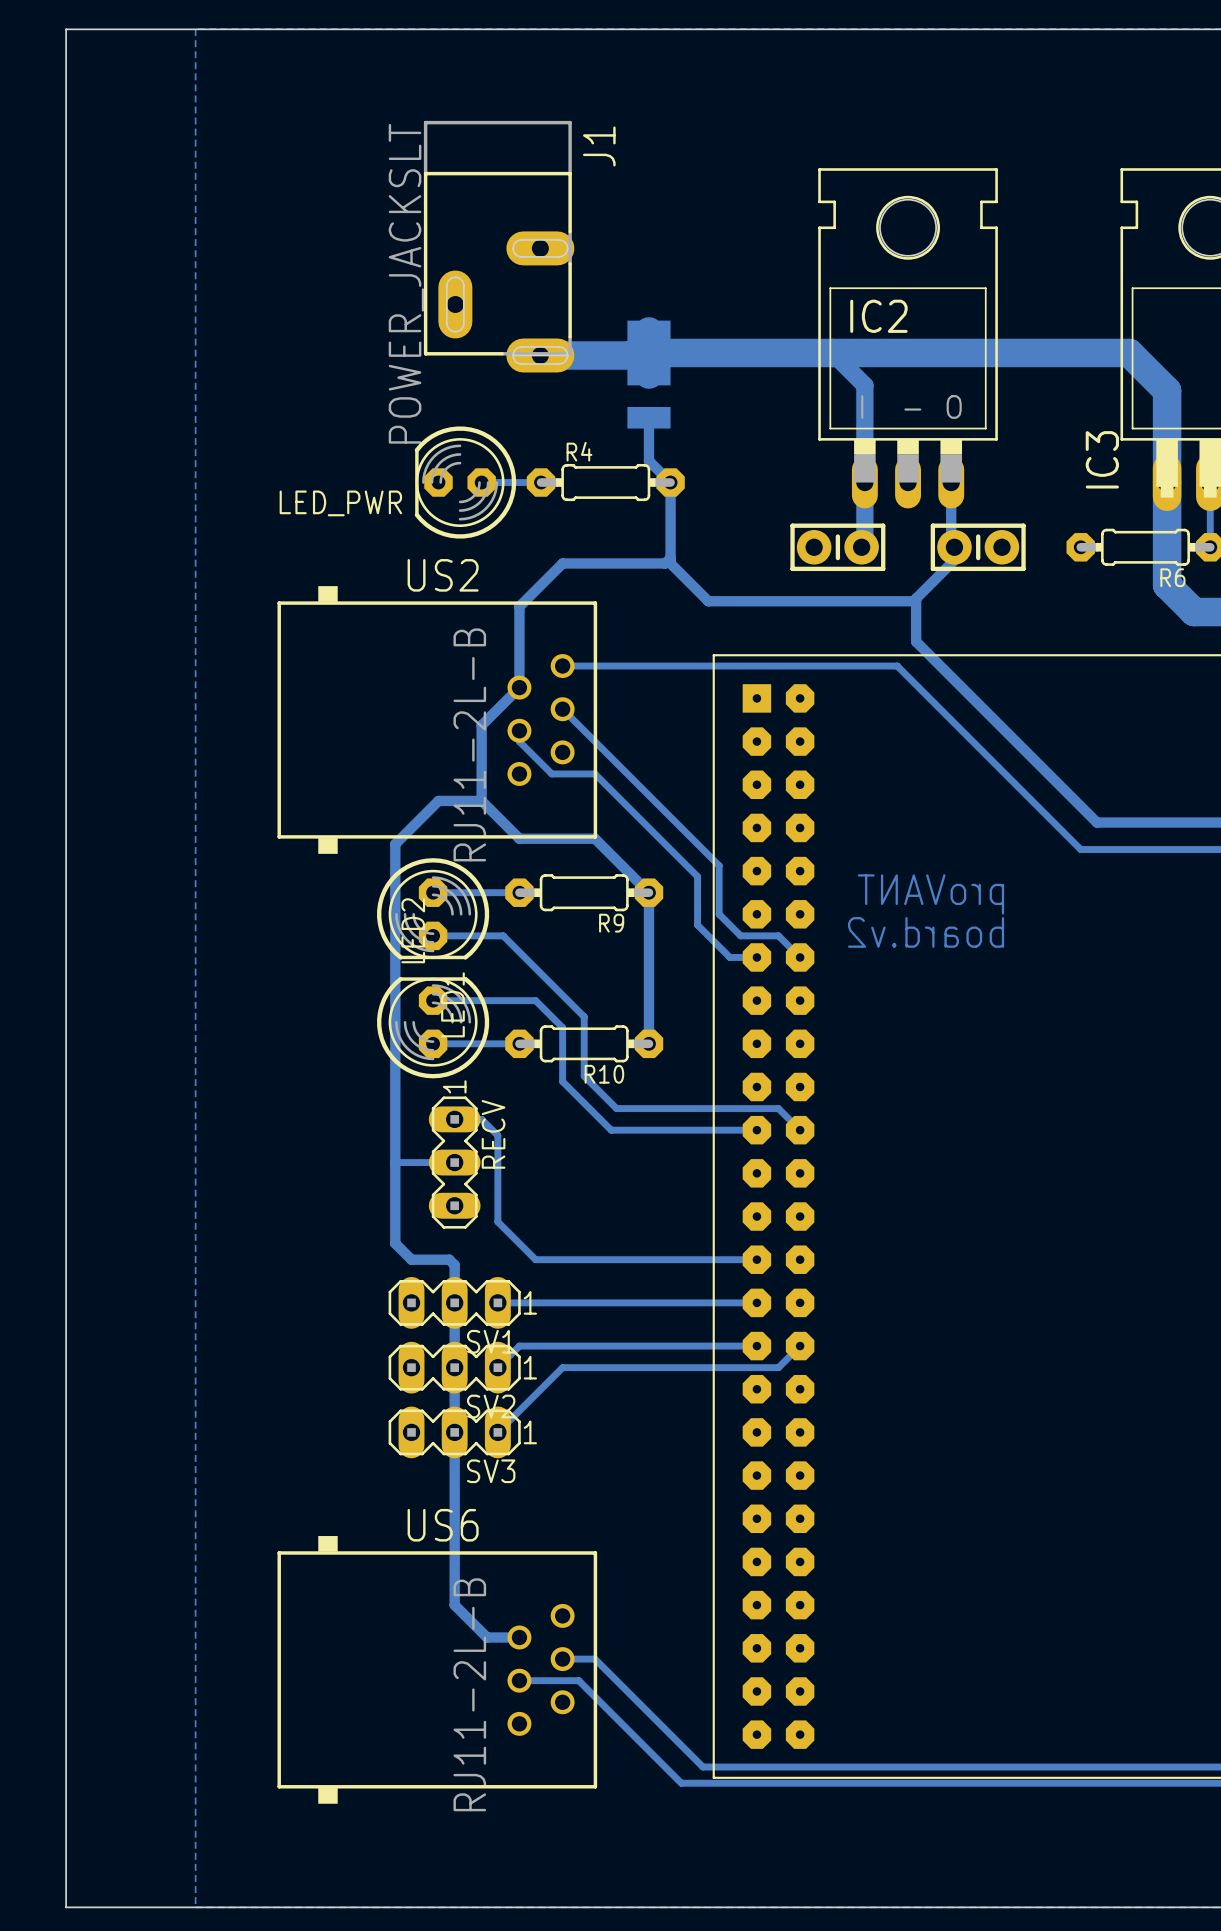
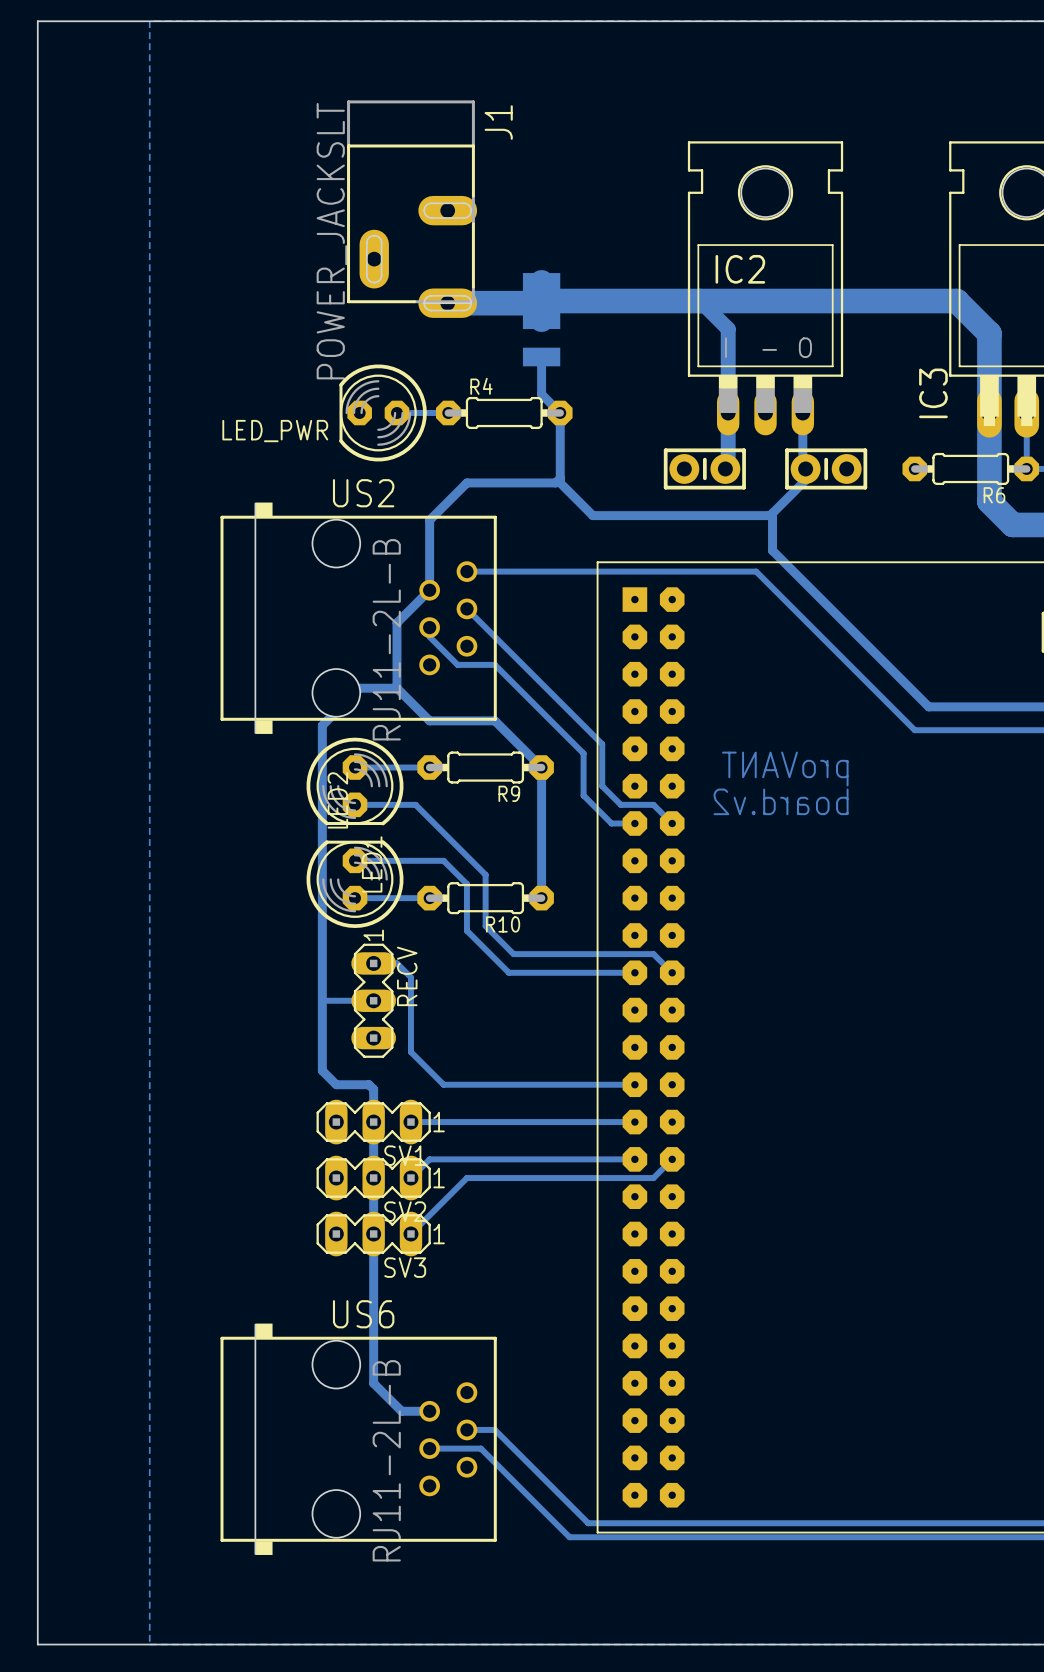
US2 footprint: [277, 586, 598, 854] -> [220, 502, 497, 734]
US6 footprint: [277, 1536, 598, 1804] -> [220, 1323, 497, 1555]

